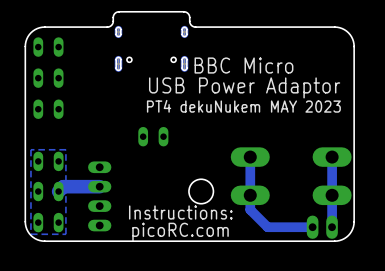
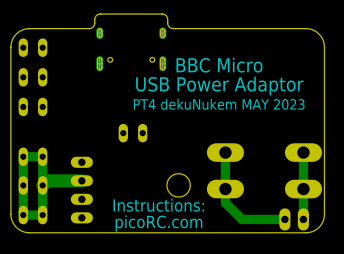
zone outline: (65, 149) (30, 149) (30, 234) (65, 234) (65, 149) -> none
track: none -> (42, 156) (23, 156) (23, 215) (42, 215) (42, 156)

